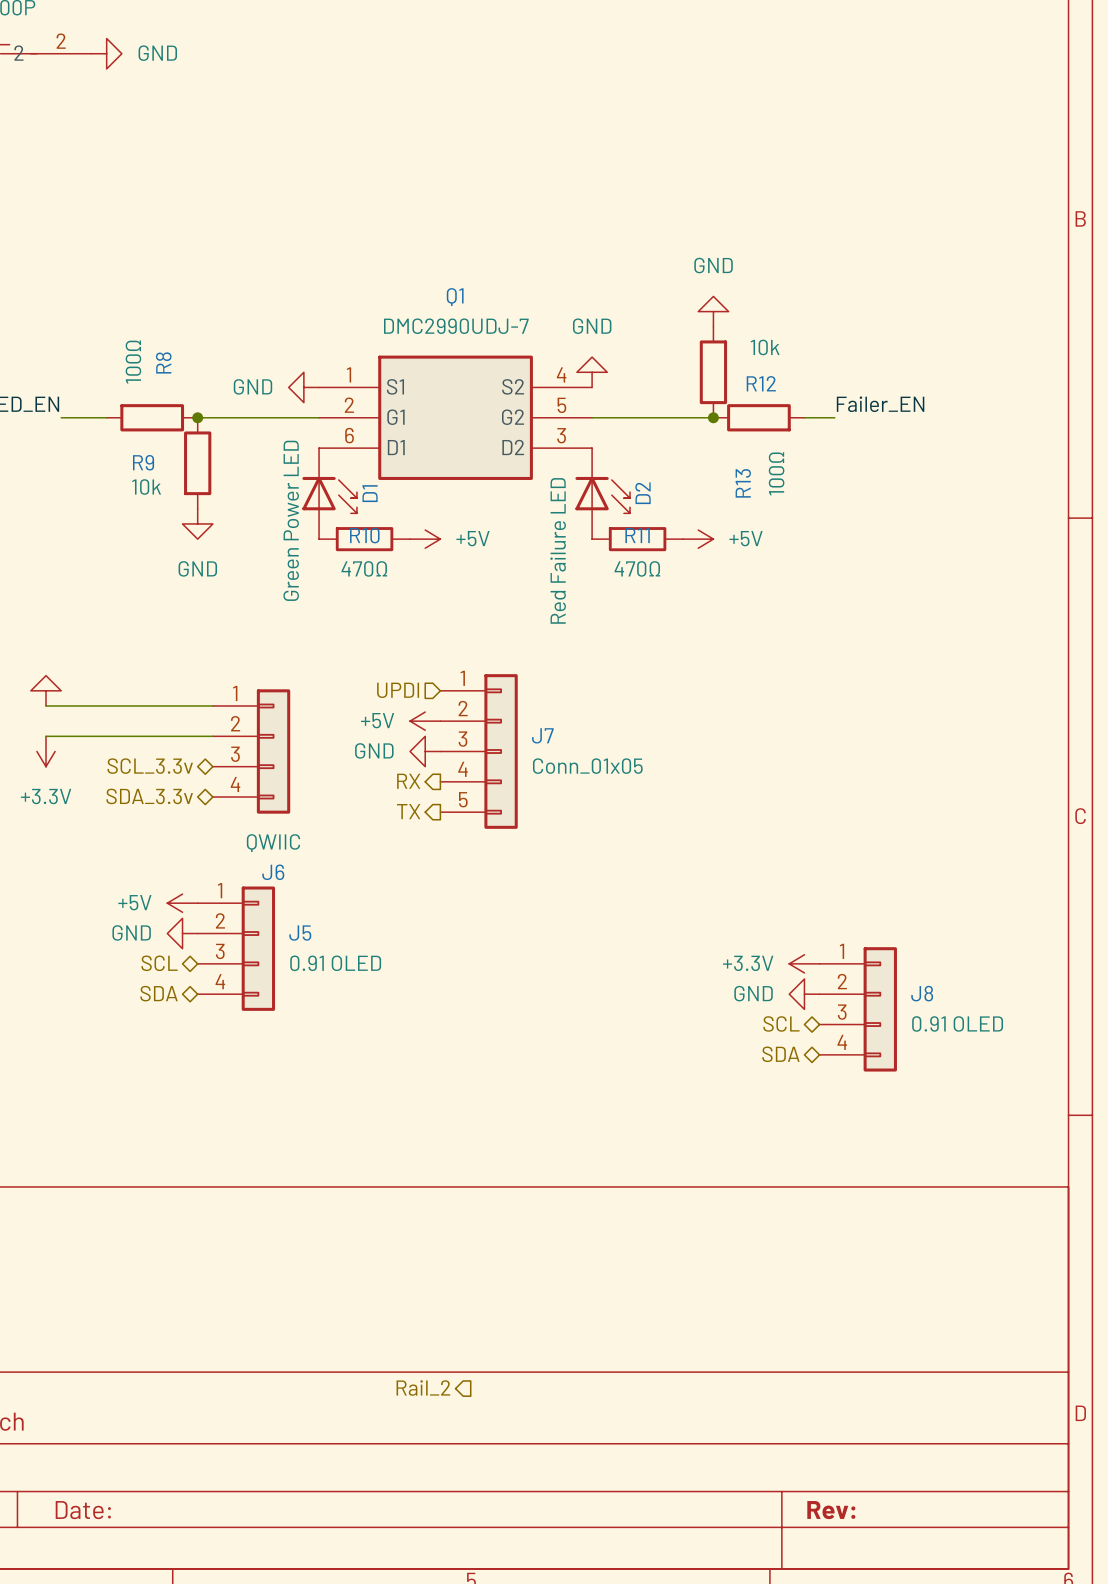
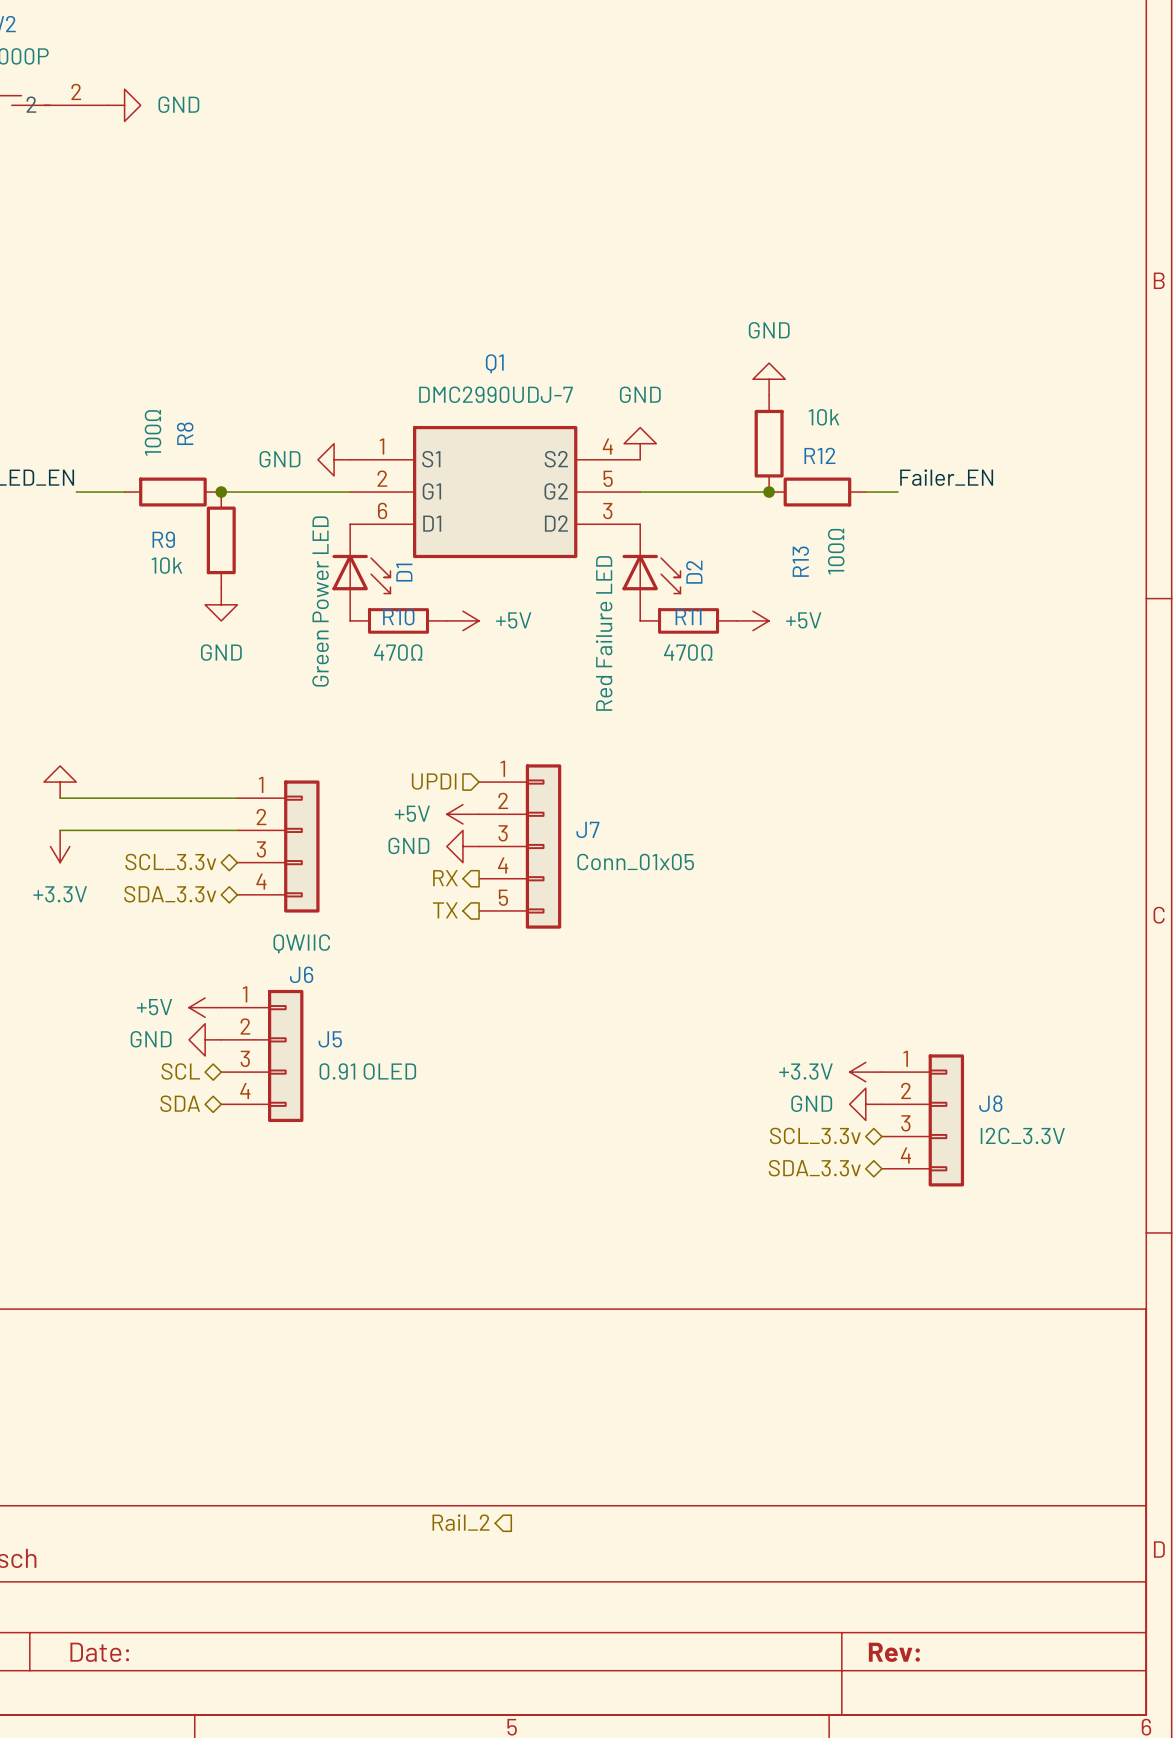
hierarchical label: SCL (781, 1023) -> SCL_3.3v (815, 1135)
J8 value: 0.91 OLED (957, 1023) -> I2C_3.3V (1022, 1135)
hierarchical label: SDA (780, 1054) -> SDA_3.3v (814, 1168)

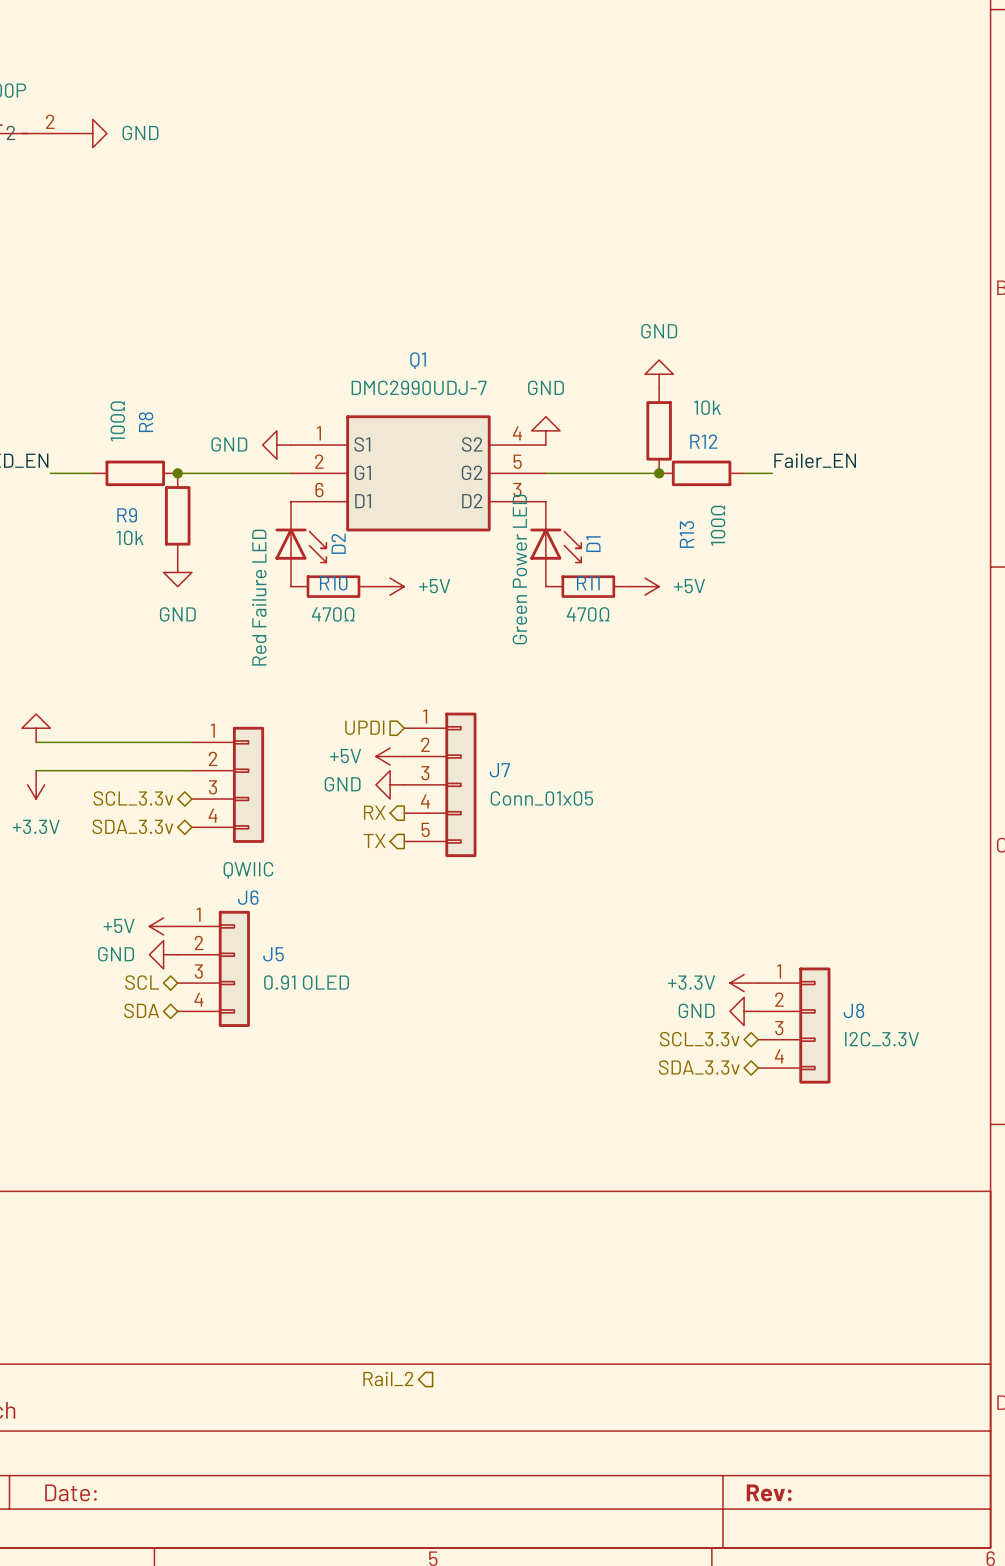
D1 name: D1 (404, 572) -> D2 (338, 543)
D2 name: D2 (694, 572) -> D1 (593, 544)
D1 value: Green Power LED (320, 601) -> Red Failure LED (259, 597)
D2 value: Red Failure LED (604, 633) -> Green Power LED (519, 569)

